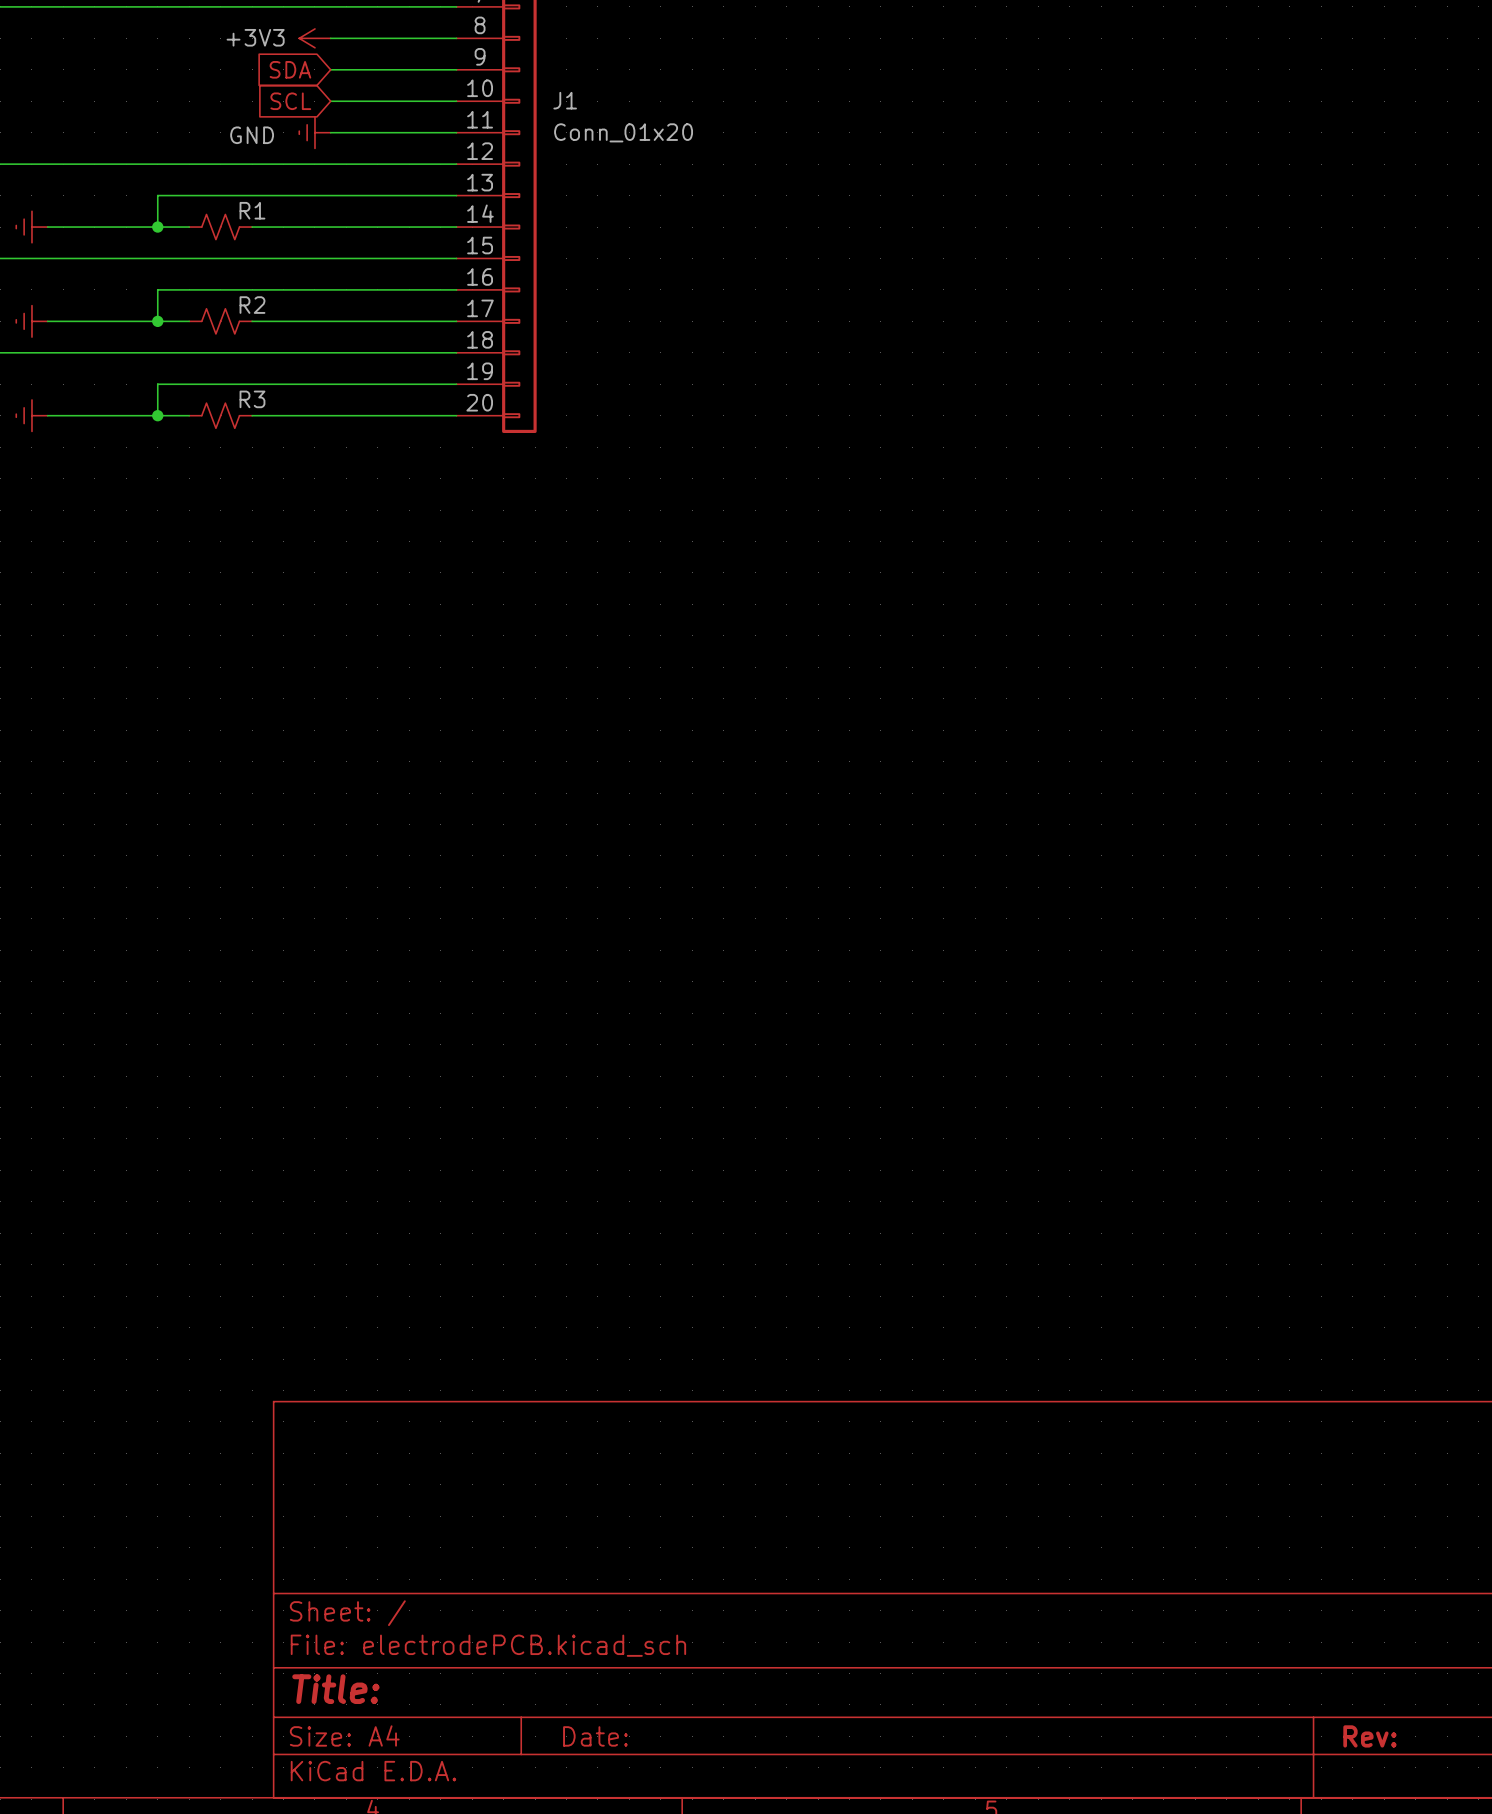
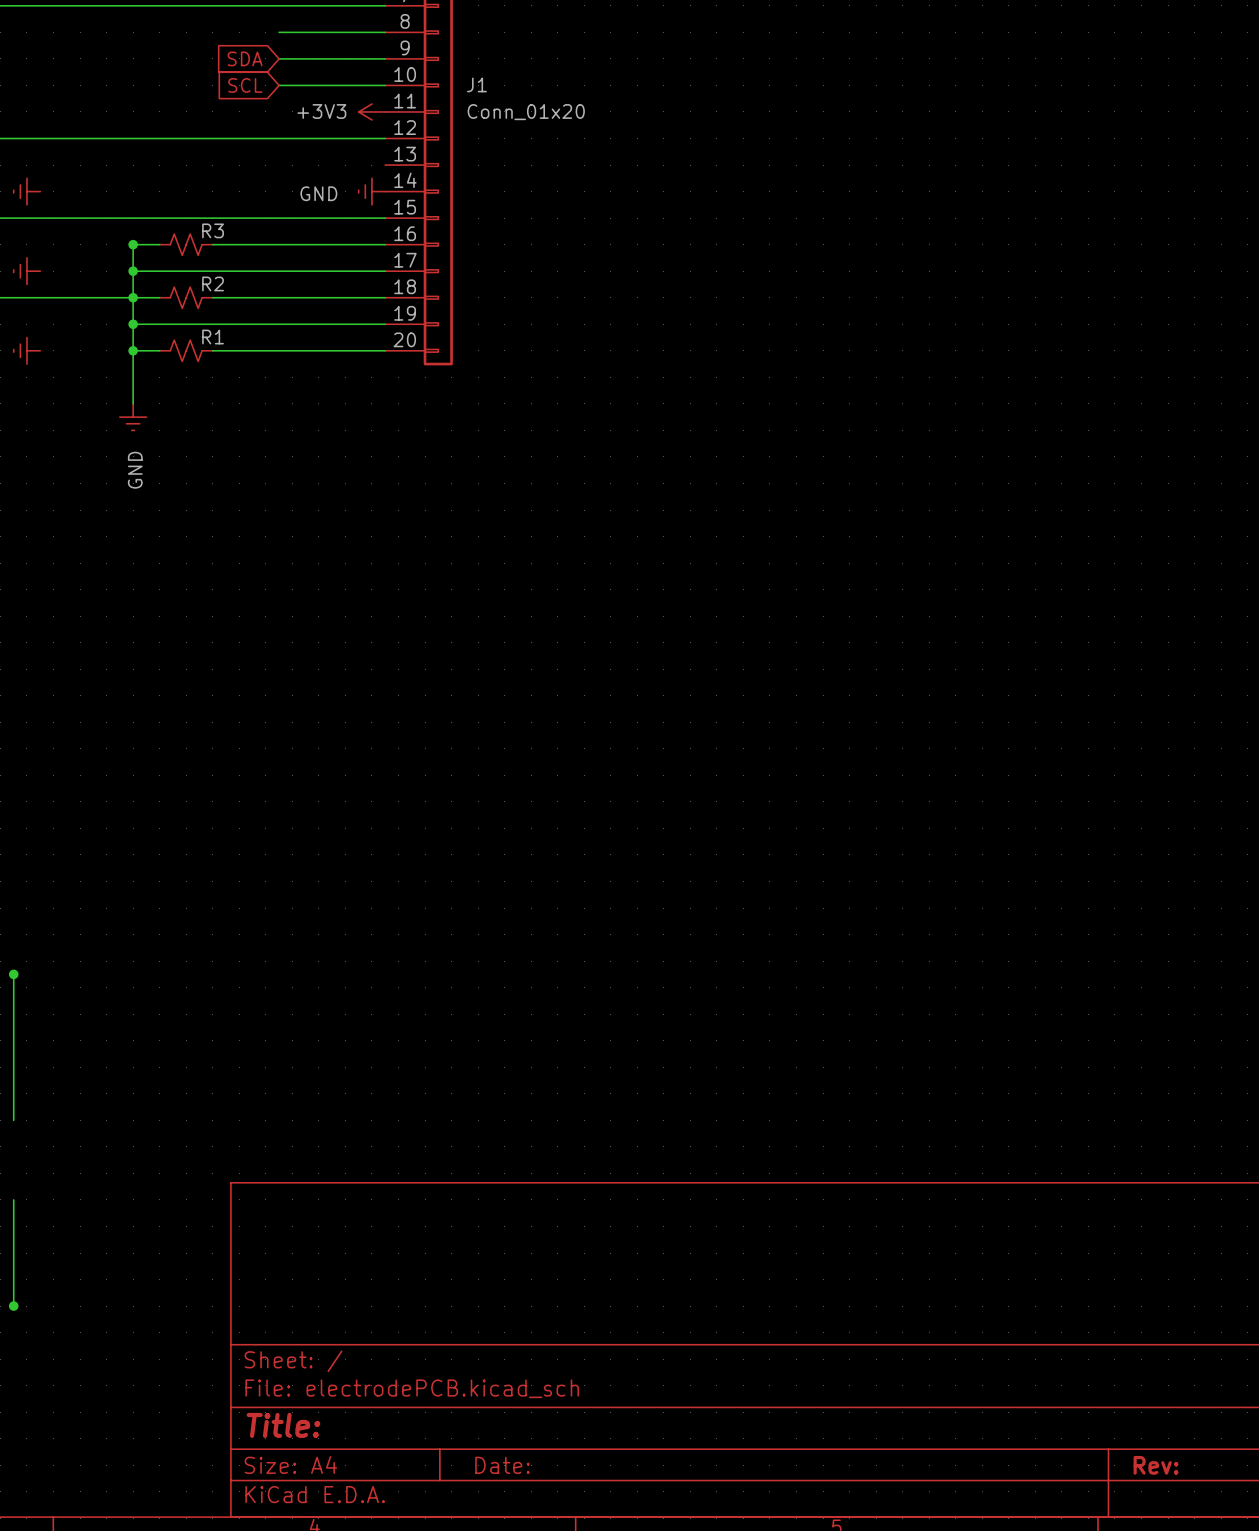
power symbol position: +3V3 (314, 38) -> +3V3 (371, 111)
power symbol position: GND (314, 132) -> GND (371, 191)
wire: (330, 132) (456, 132) -> none
wire: (456, 195) (157, 195) (157, 227) -> none
wire: (47, 227) (189, 227) -> none
junction: (157, 227) -> none
R1: (220, 227) -> none
wire: (252, 227) (456, 227) -> none
junction: none -> (133, 244)
R3: none -> (186, 244)
wire: (47, 321) (157, 321) -> (133, 324) (133, 271)
R2 position: (220, 321) -> (186, 297)
junction: none -> (133, 297)
junction: none -> (133, 324)
R3 name: R3 (252, 399) -> R1 (213, 337)
wire: (47, 415) (157, 415) -> (133, 403) (133, 350)
power symbol: none -> GND (133, 417)
wire: none -> (13, 974) (13, 1120)
junction: none -> (13, 974)
wire: none -> (13, 1199) (13, 1306)
junction: none -> (13, 1306)

